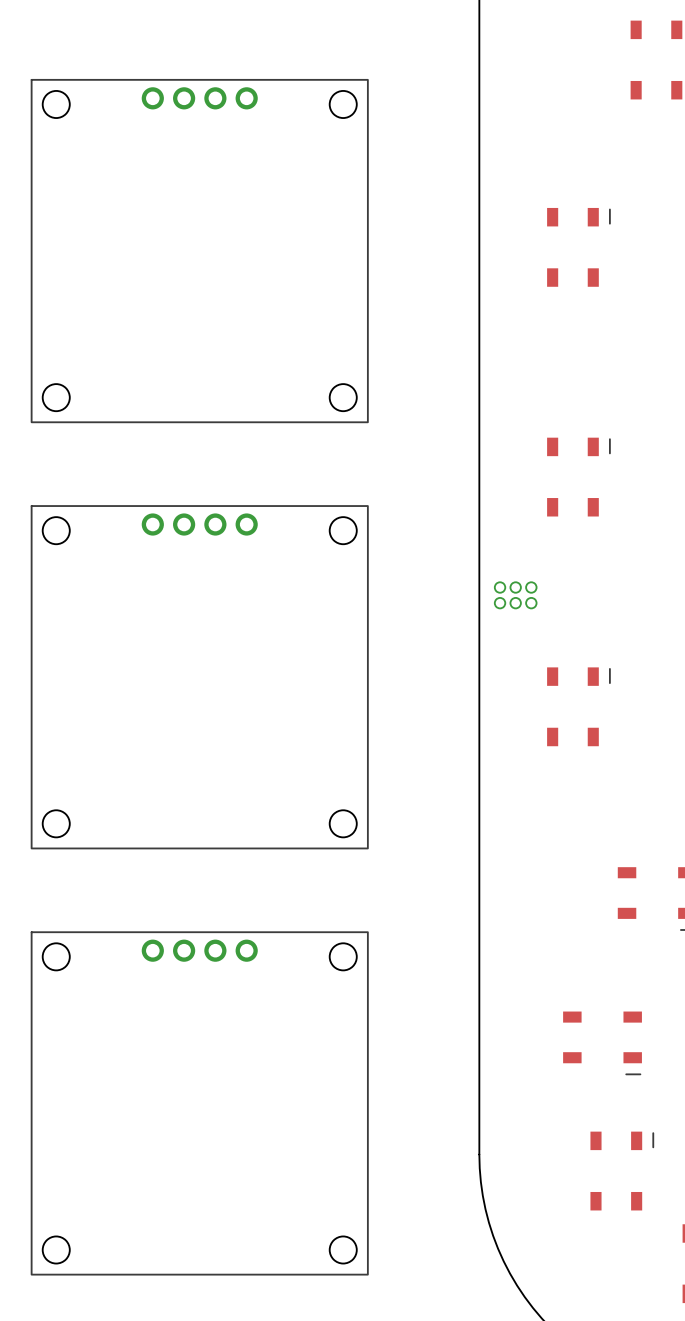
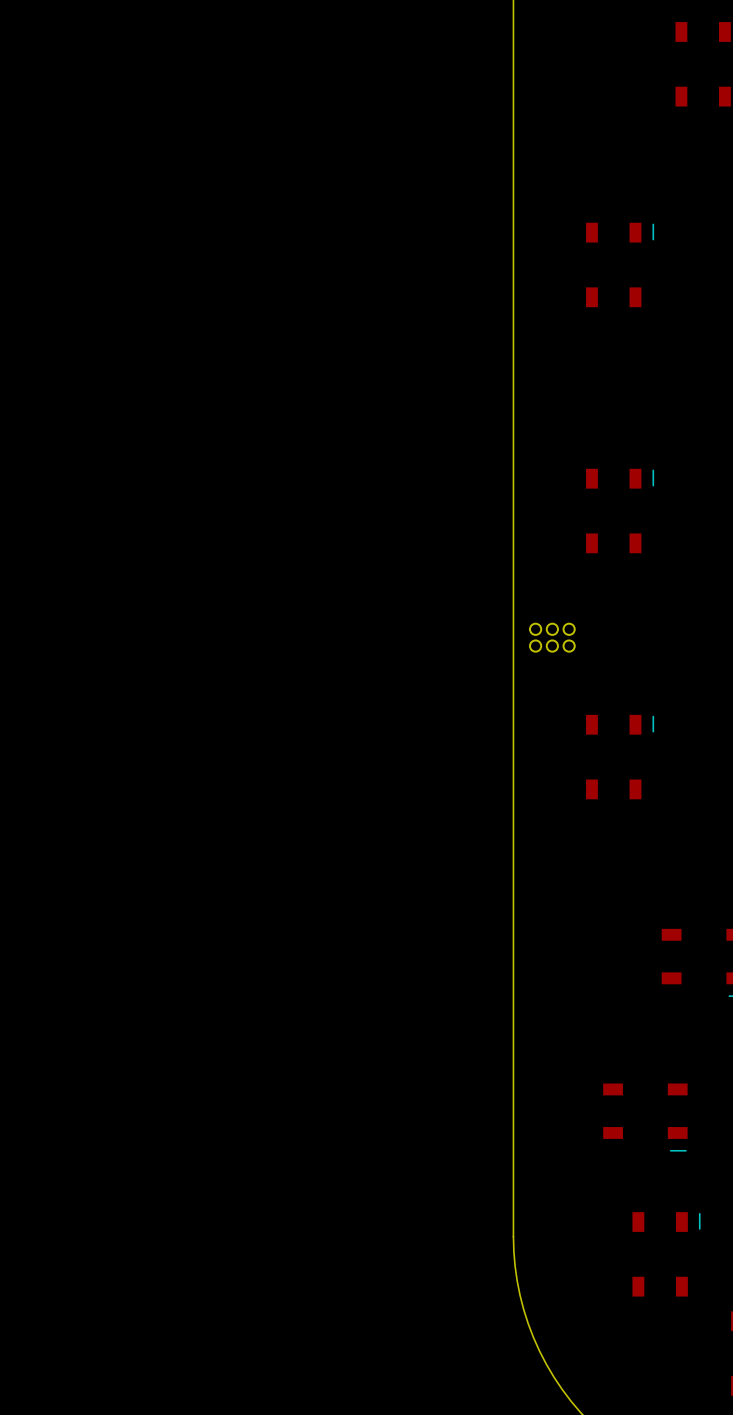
part: (199, 251) -> none
part: (199, 677) -> none
part: (199, 1103) -> none

